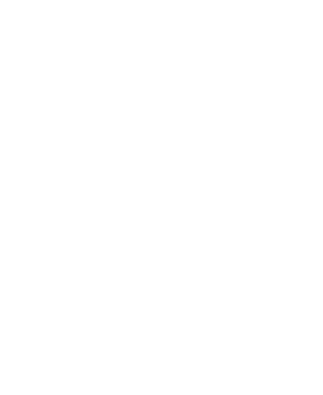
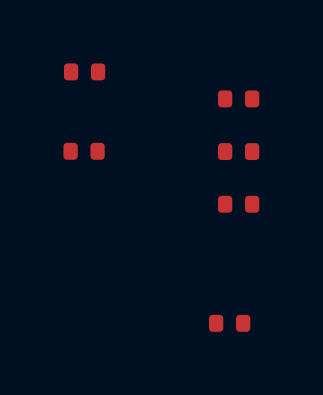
part: none -> (84, 71)
part: none -> (238, 98)
part: none -> (84, 151)
part: none -> (238, 151)
part: none -> (238, 204)
part: none -> (229, 323)

